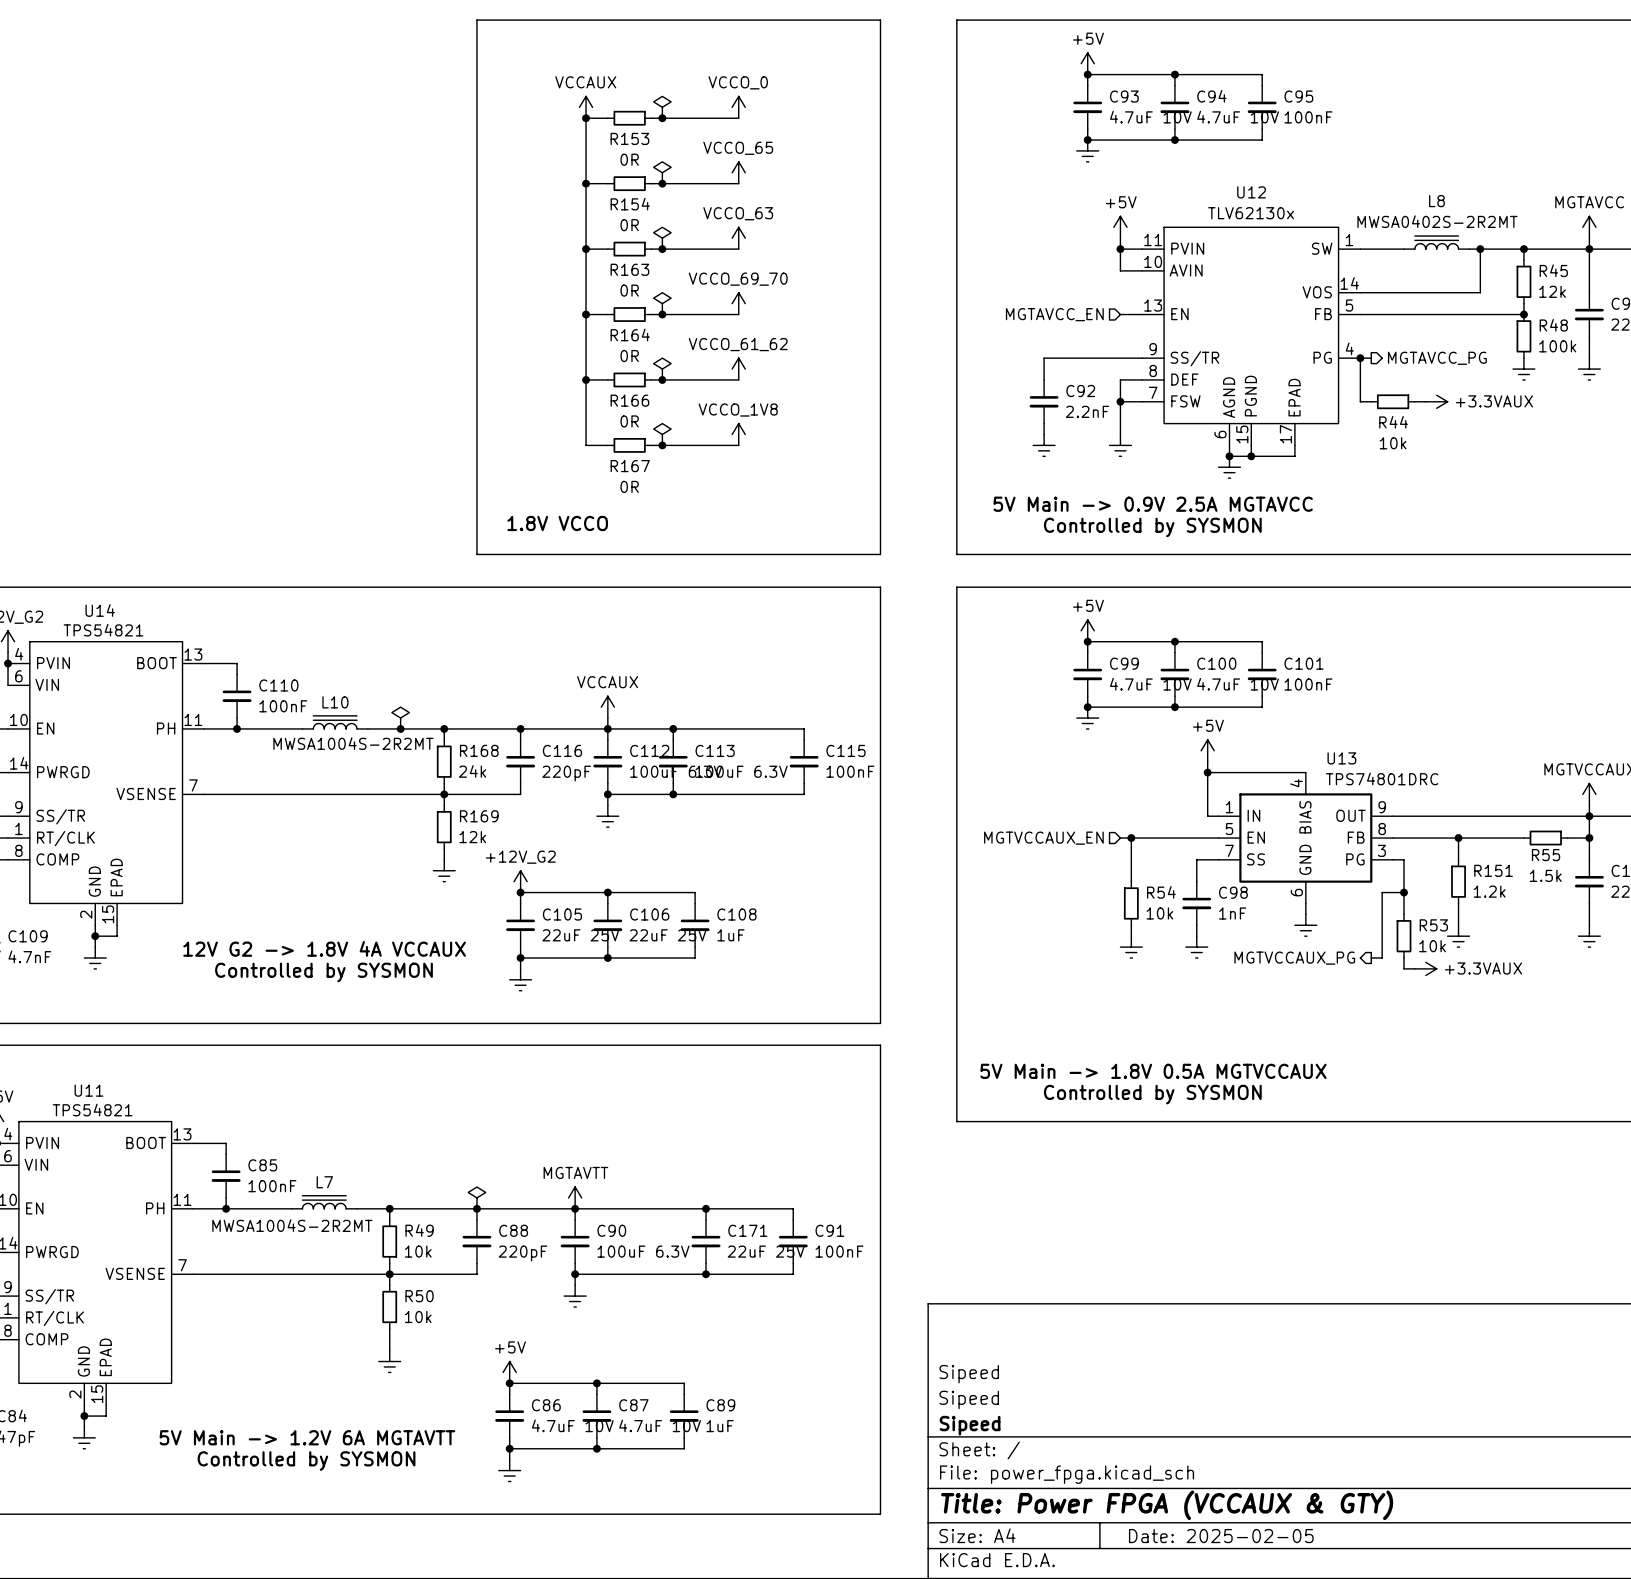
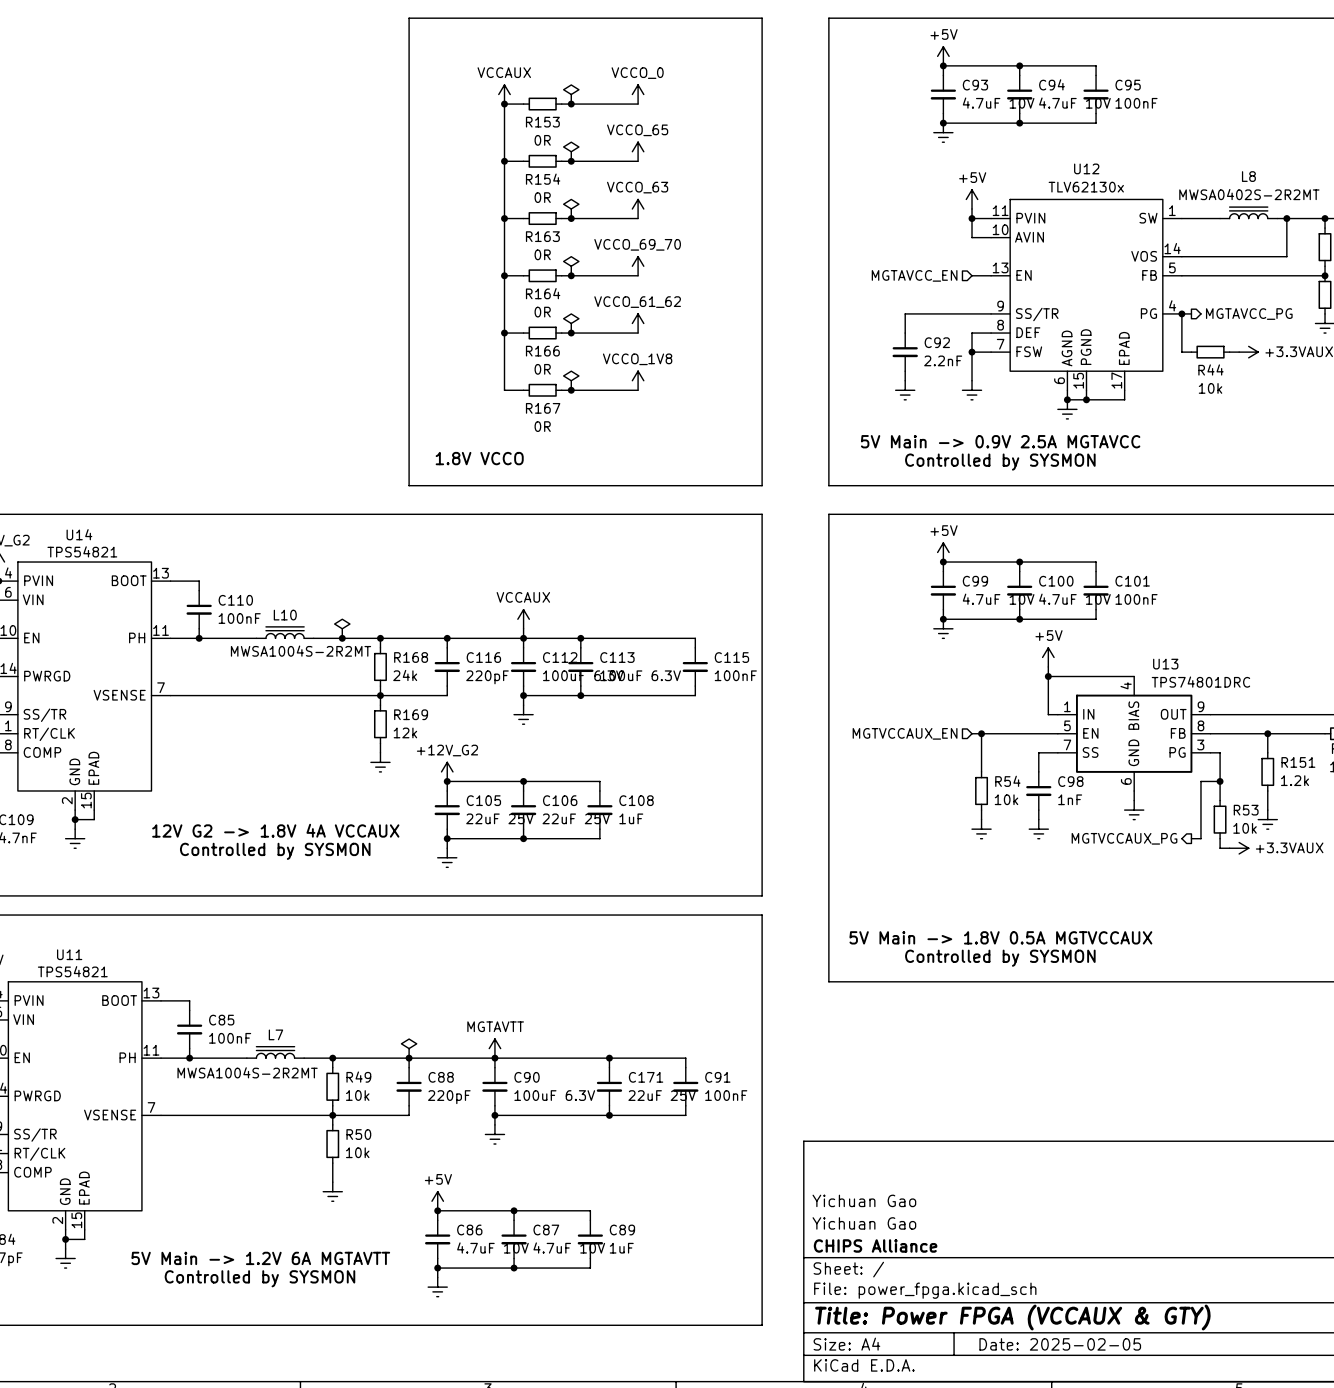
title block: Sipeed (969, 1374) -> Yichuan Gao (864, 1200)
title block: Sipeed (969, 1399) -> Yichuan Gao (864, 1223)
title block: Sipeed (970, 1425) -> CHIPS Alliance (875, 1245)

